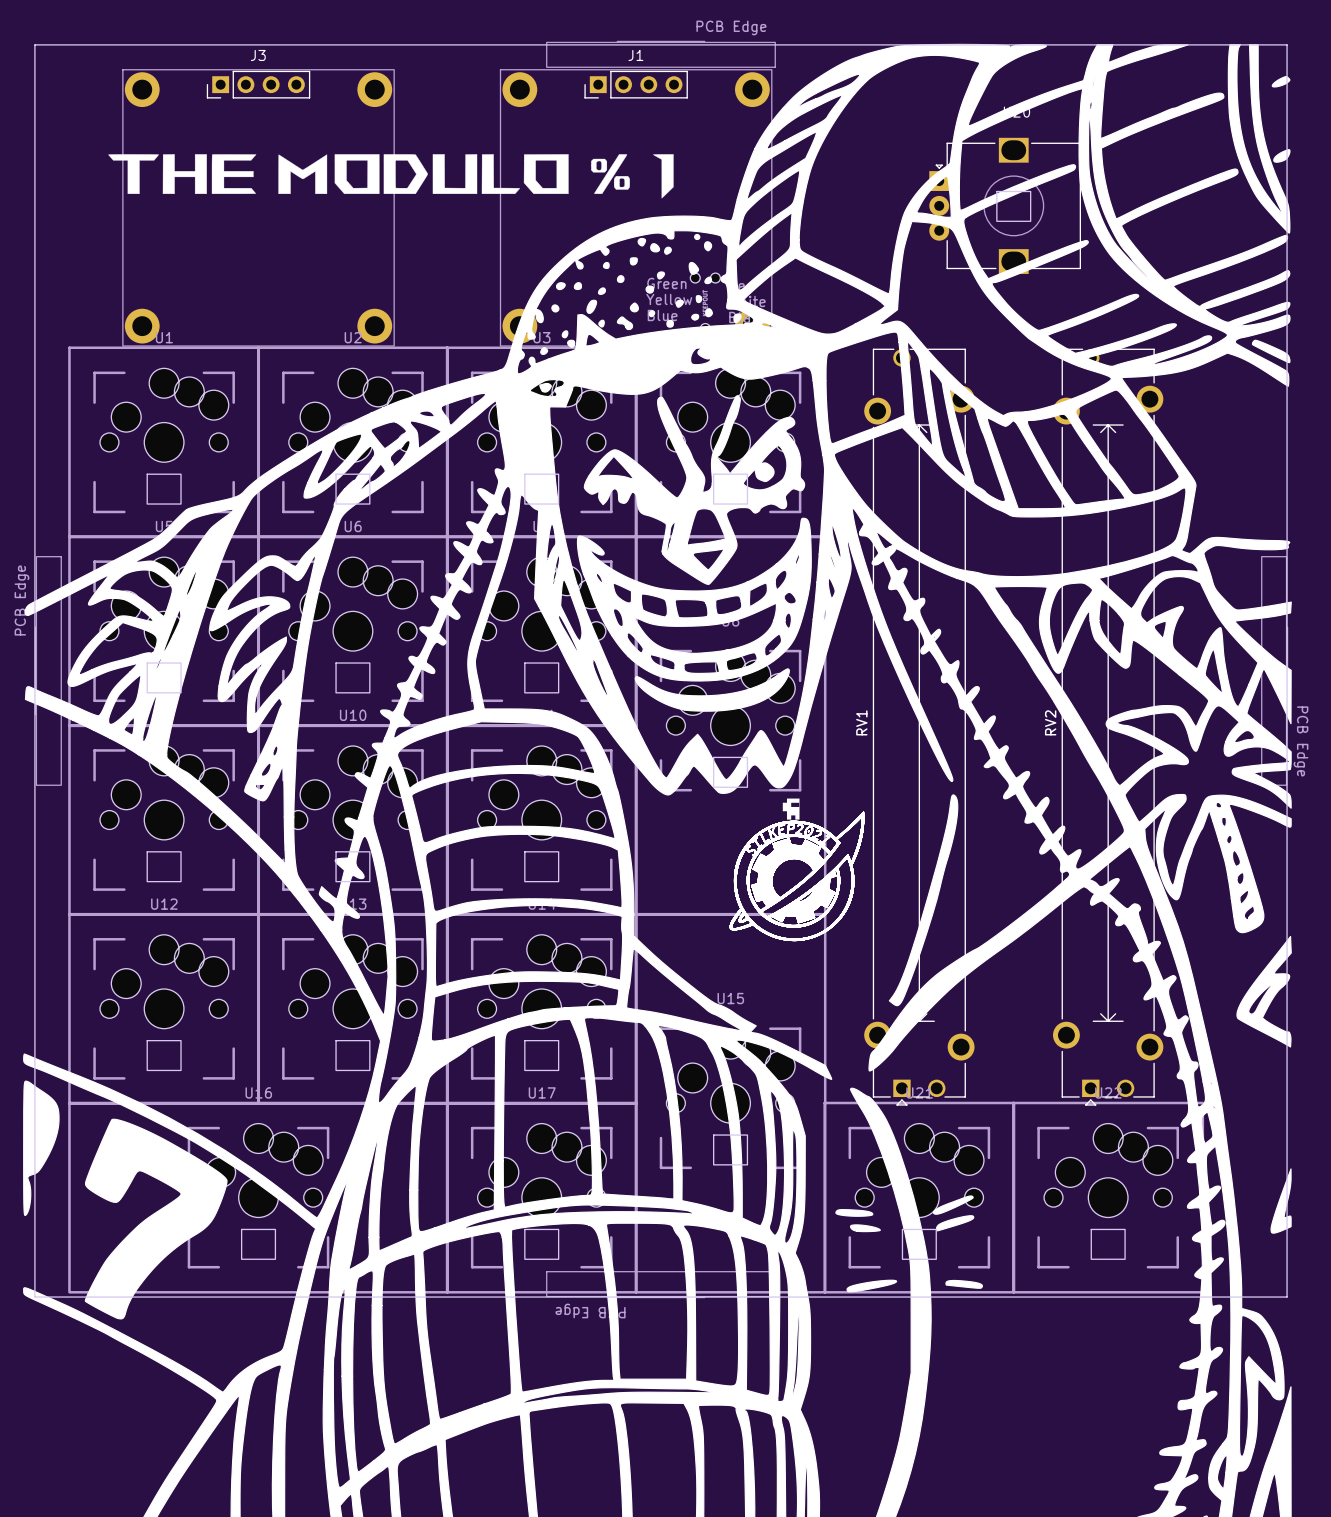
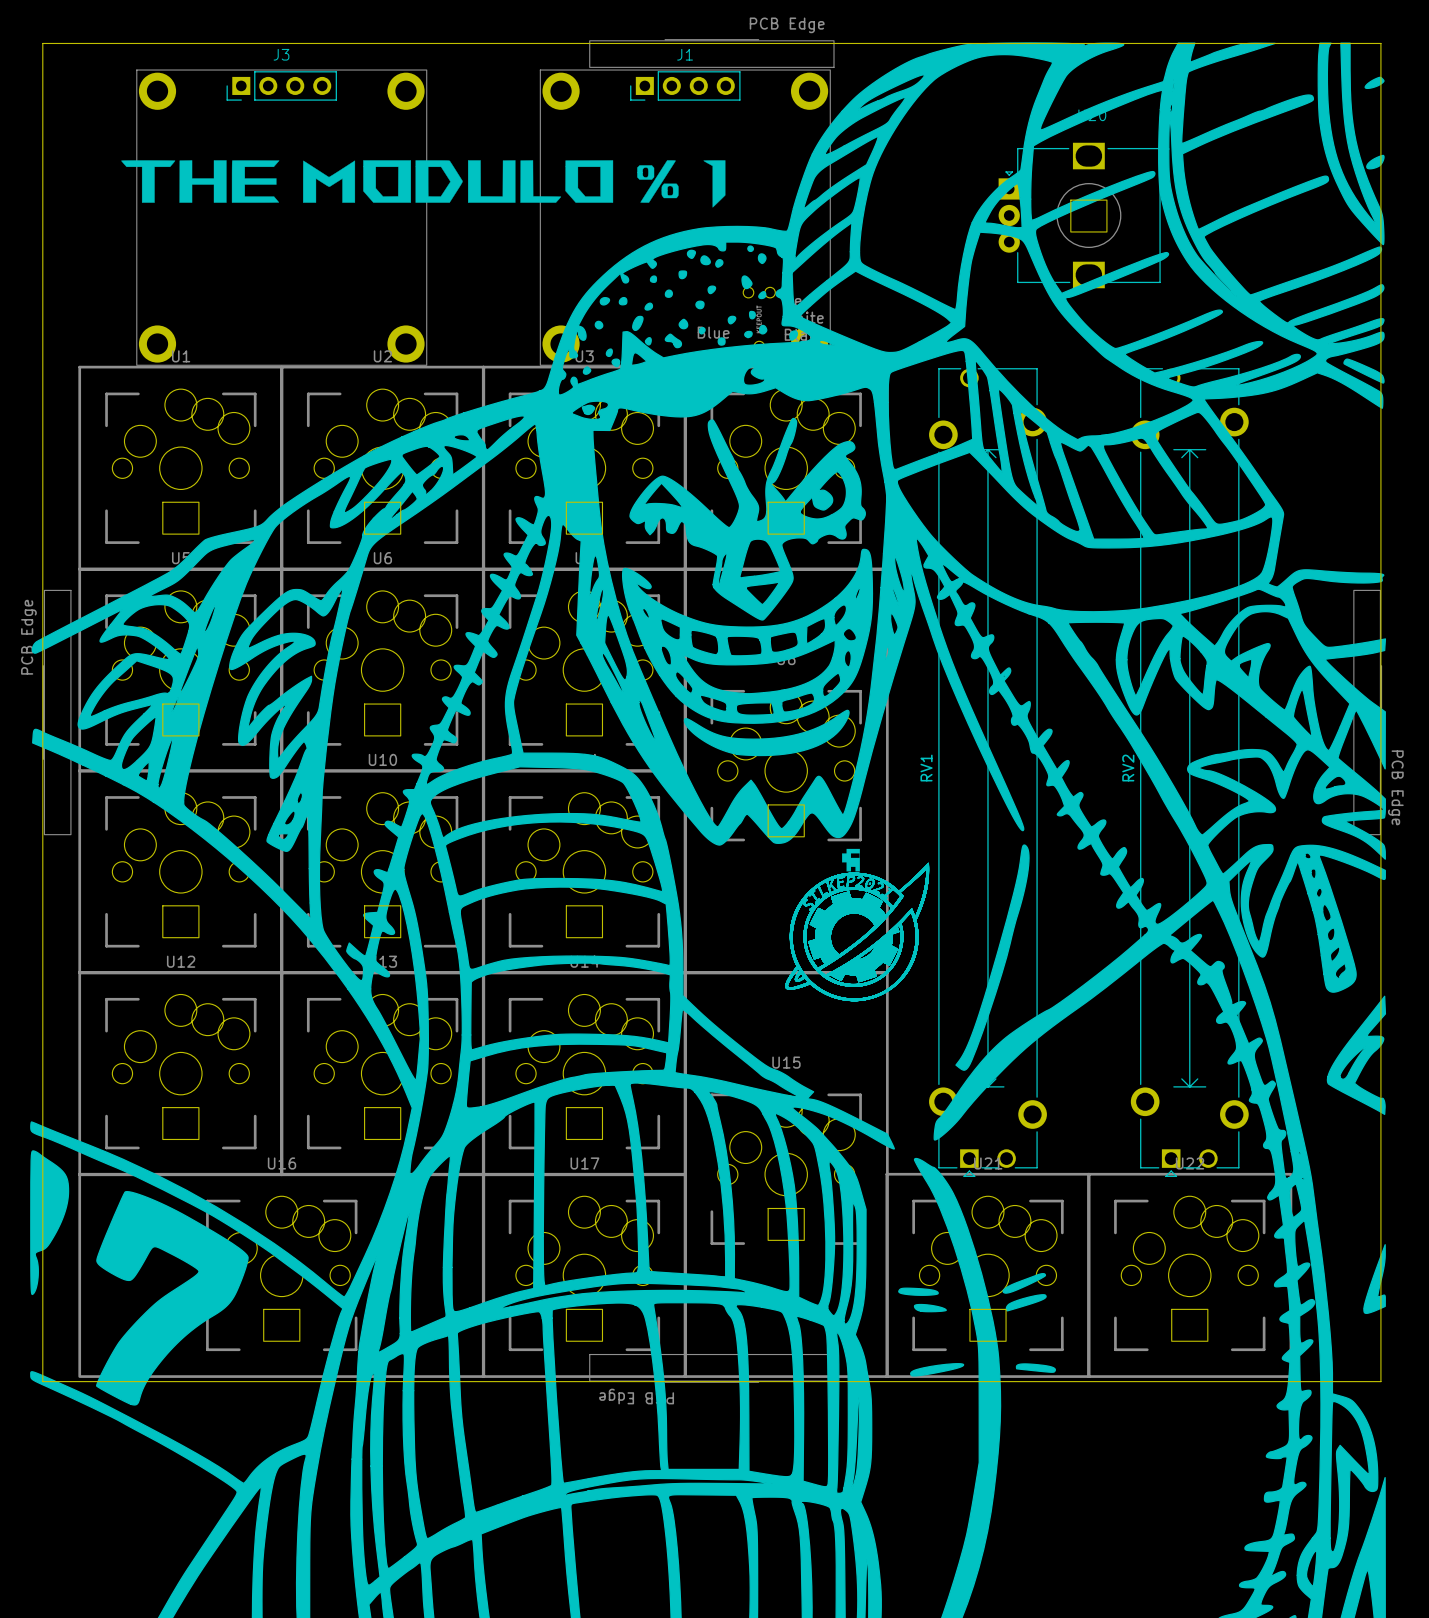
text: Green (666, 283) -> none
text: Yellow (669, 299) -> none

